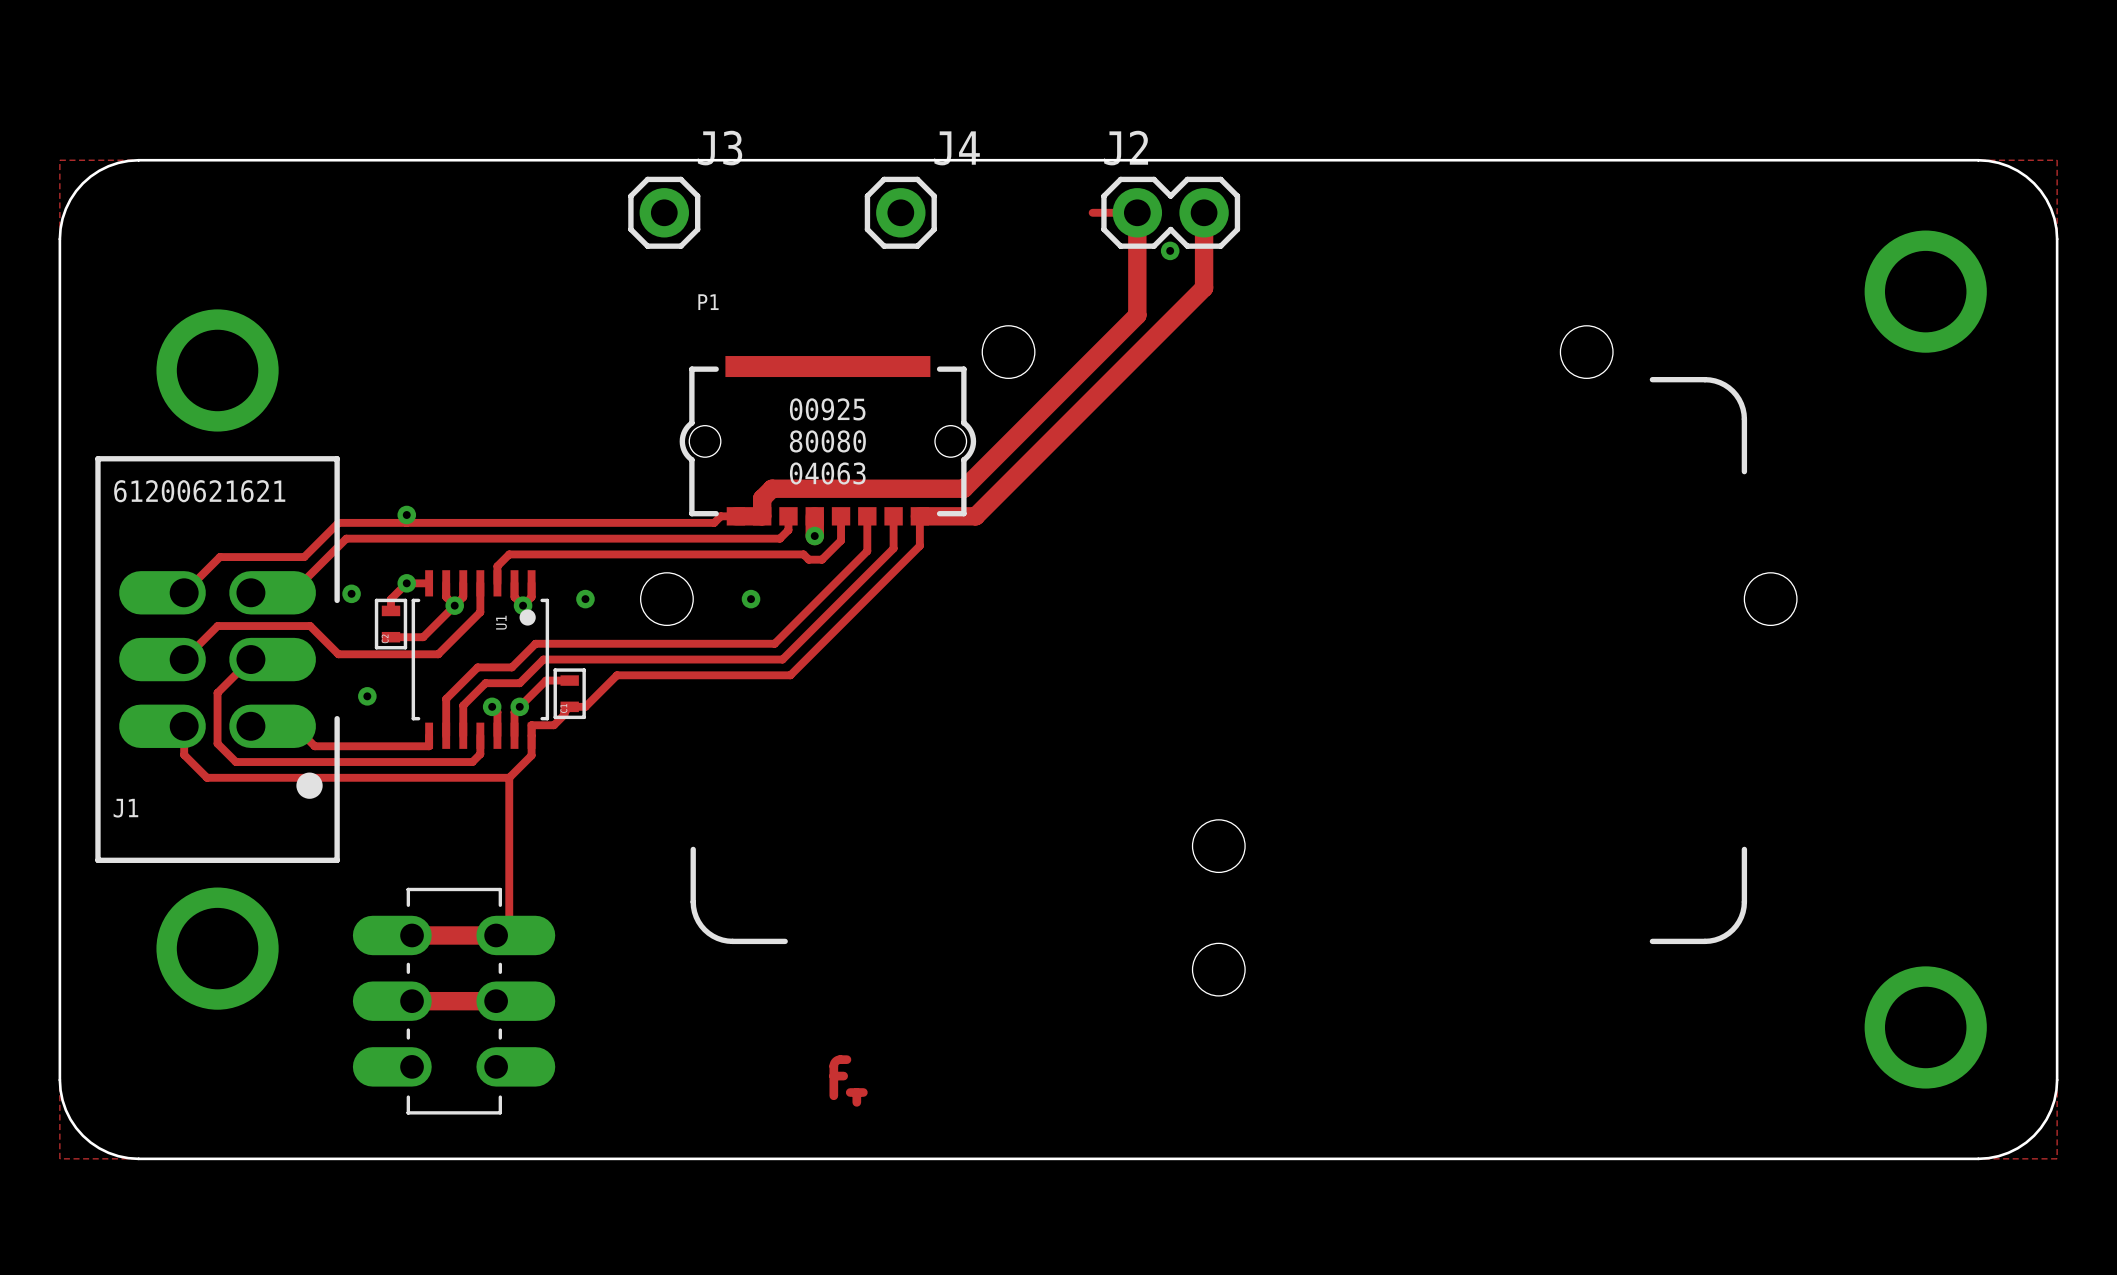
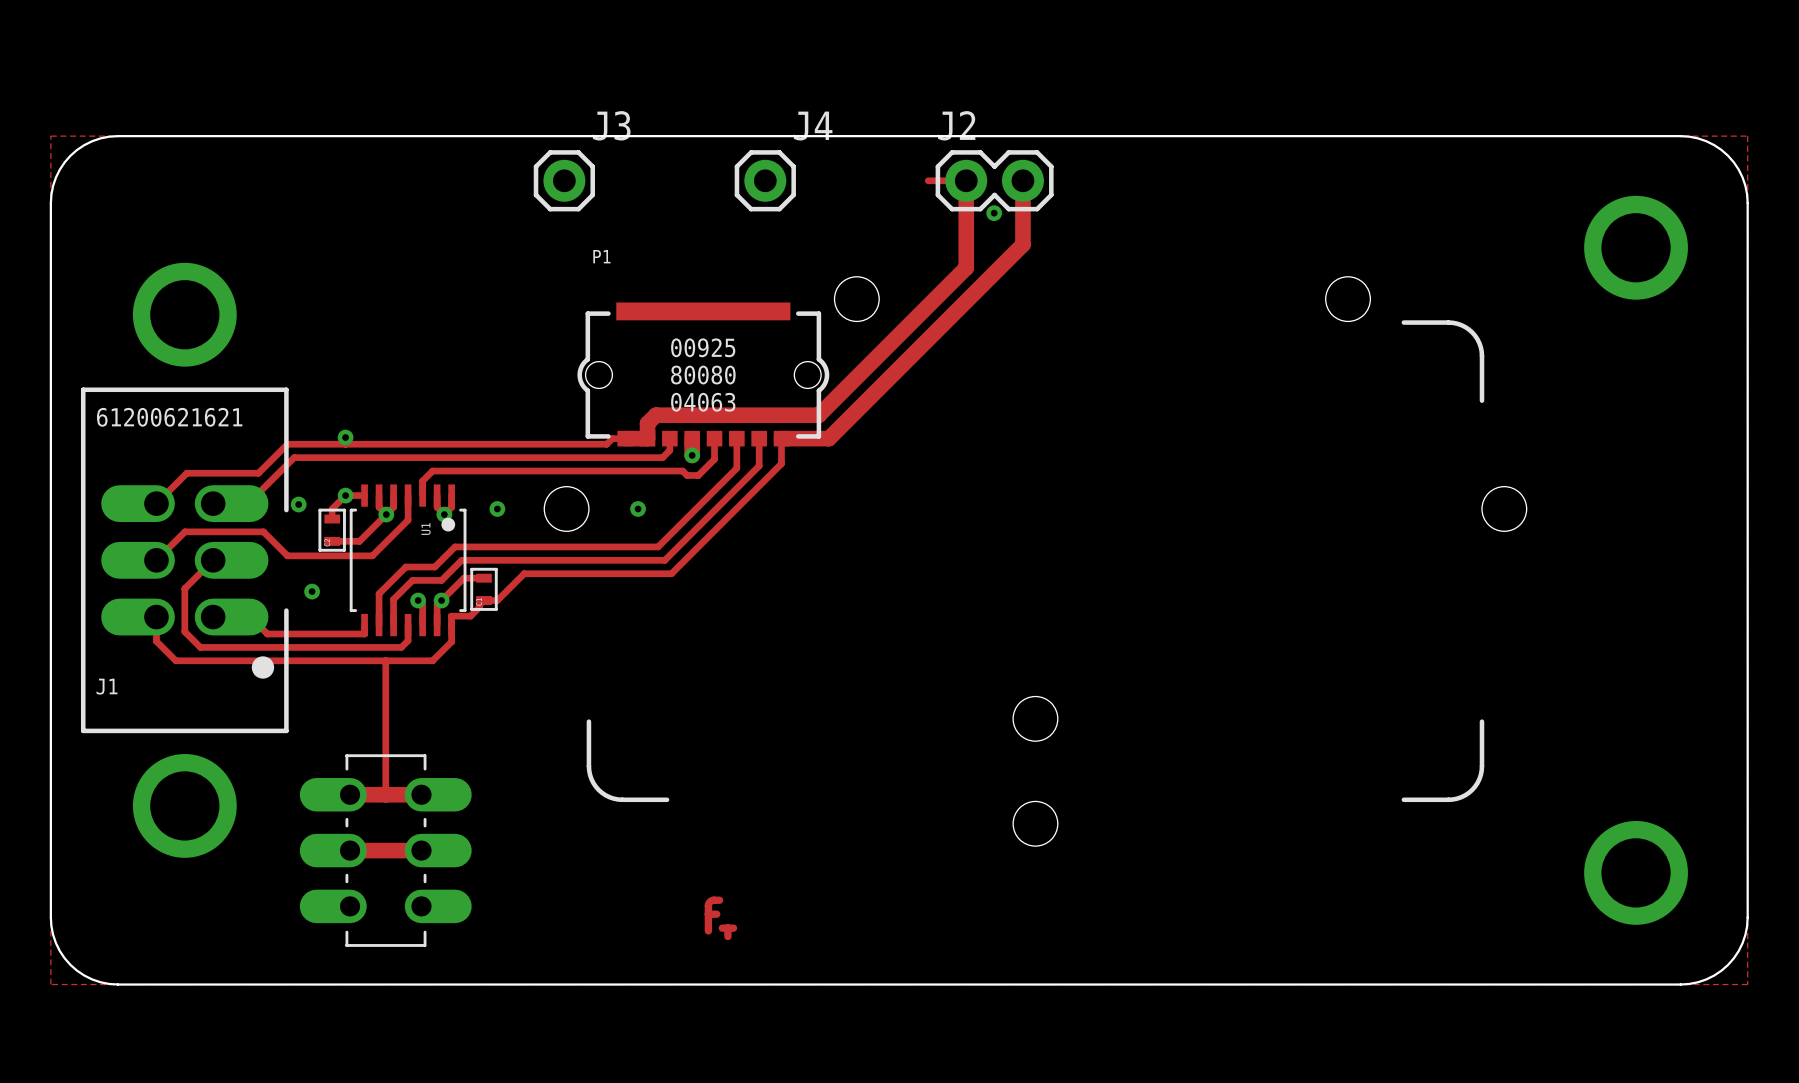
track: none -> (385, 660) (385, 794)
track: (509, 777) (509, 922) (496, 935) -> none

